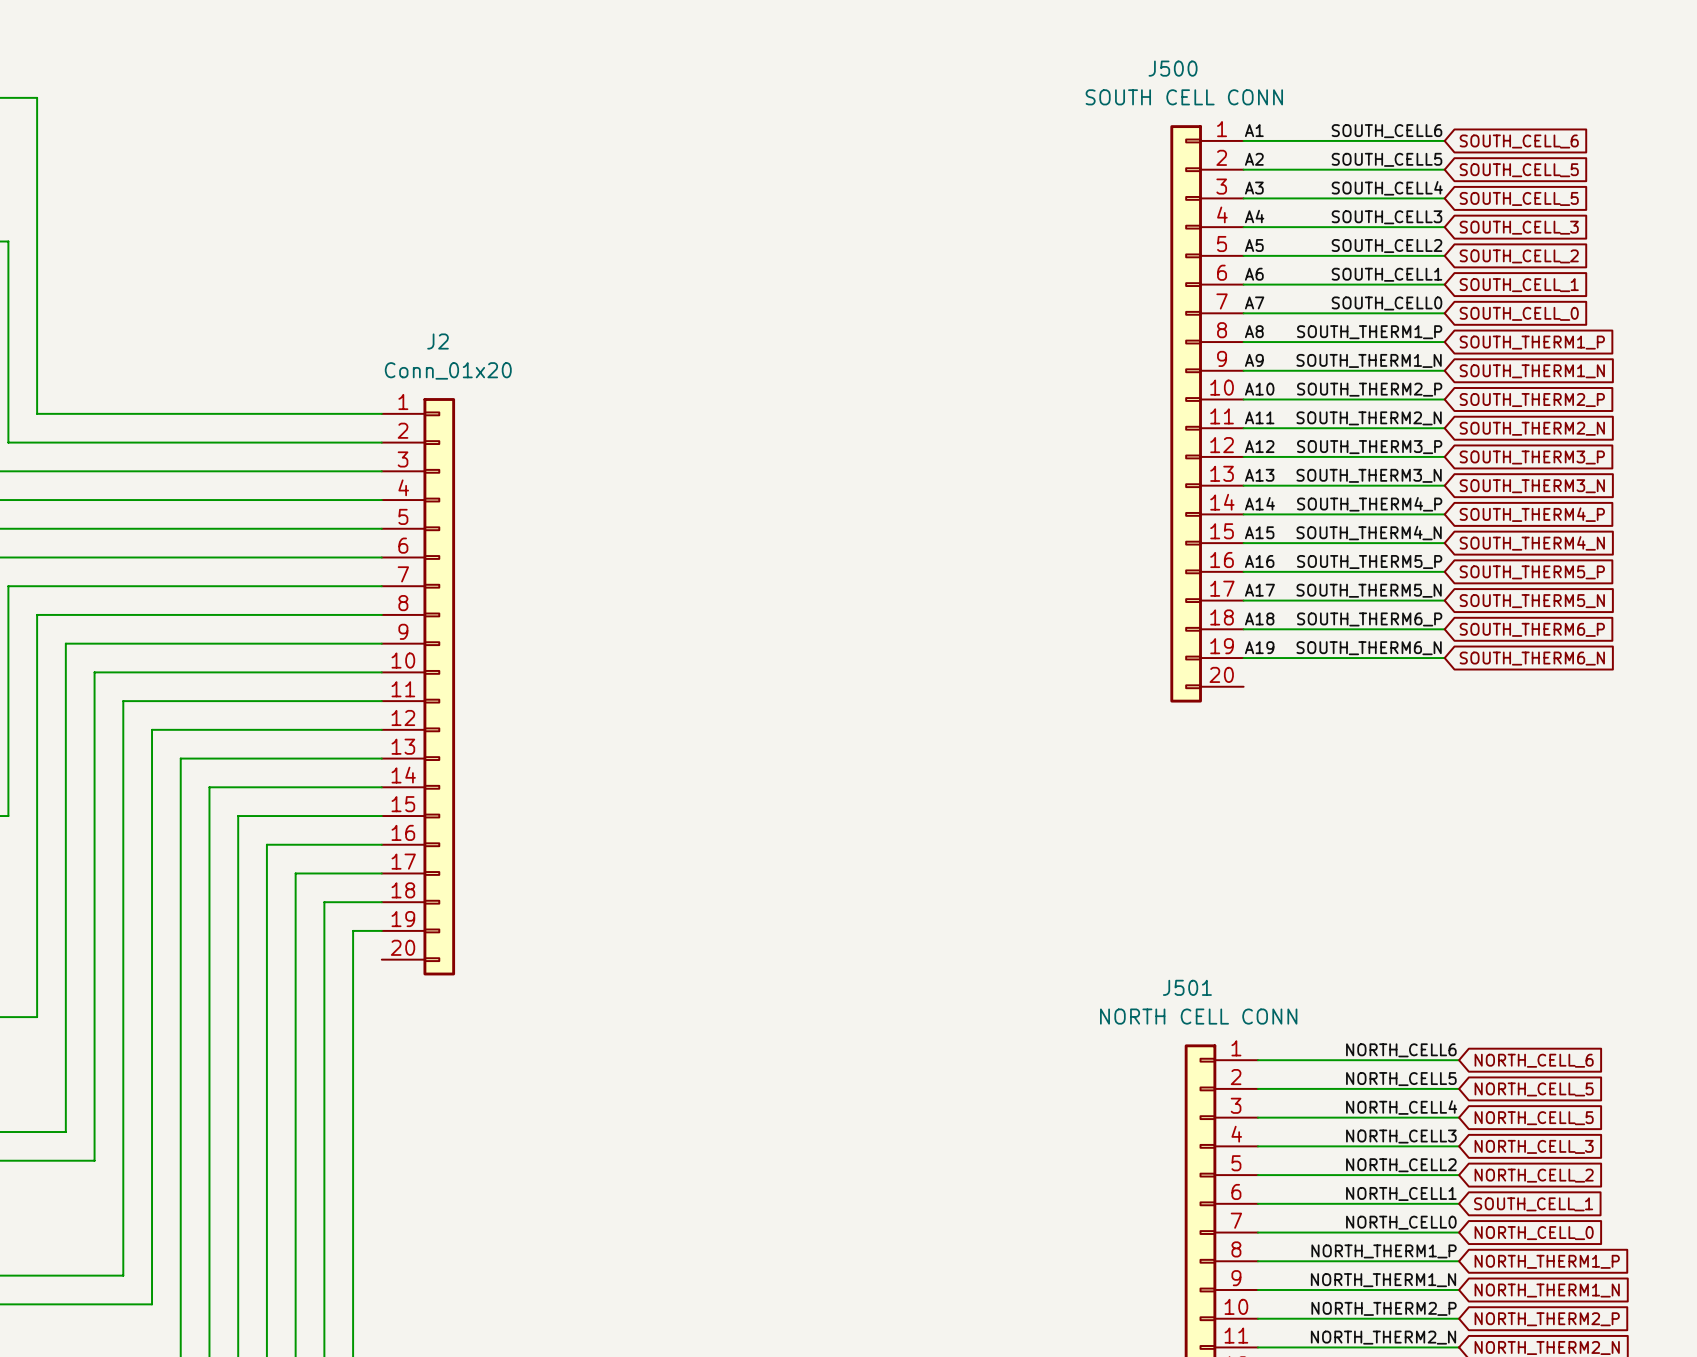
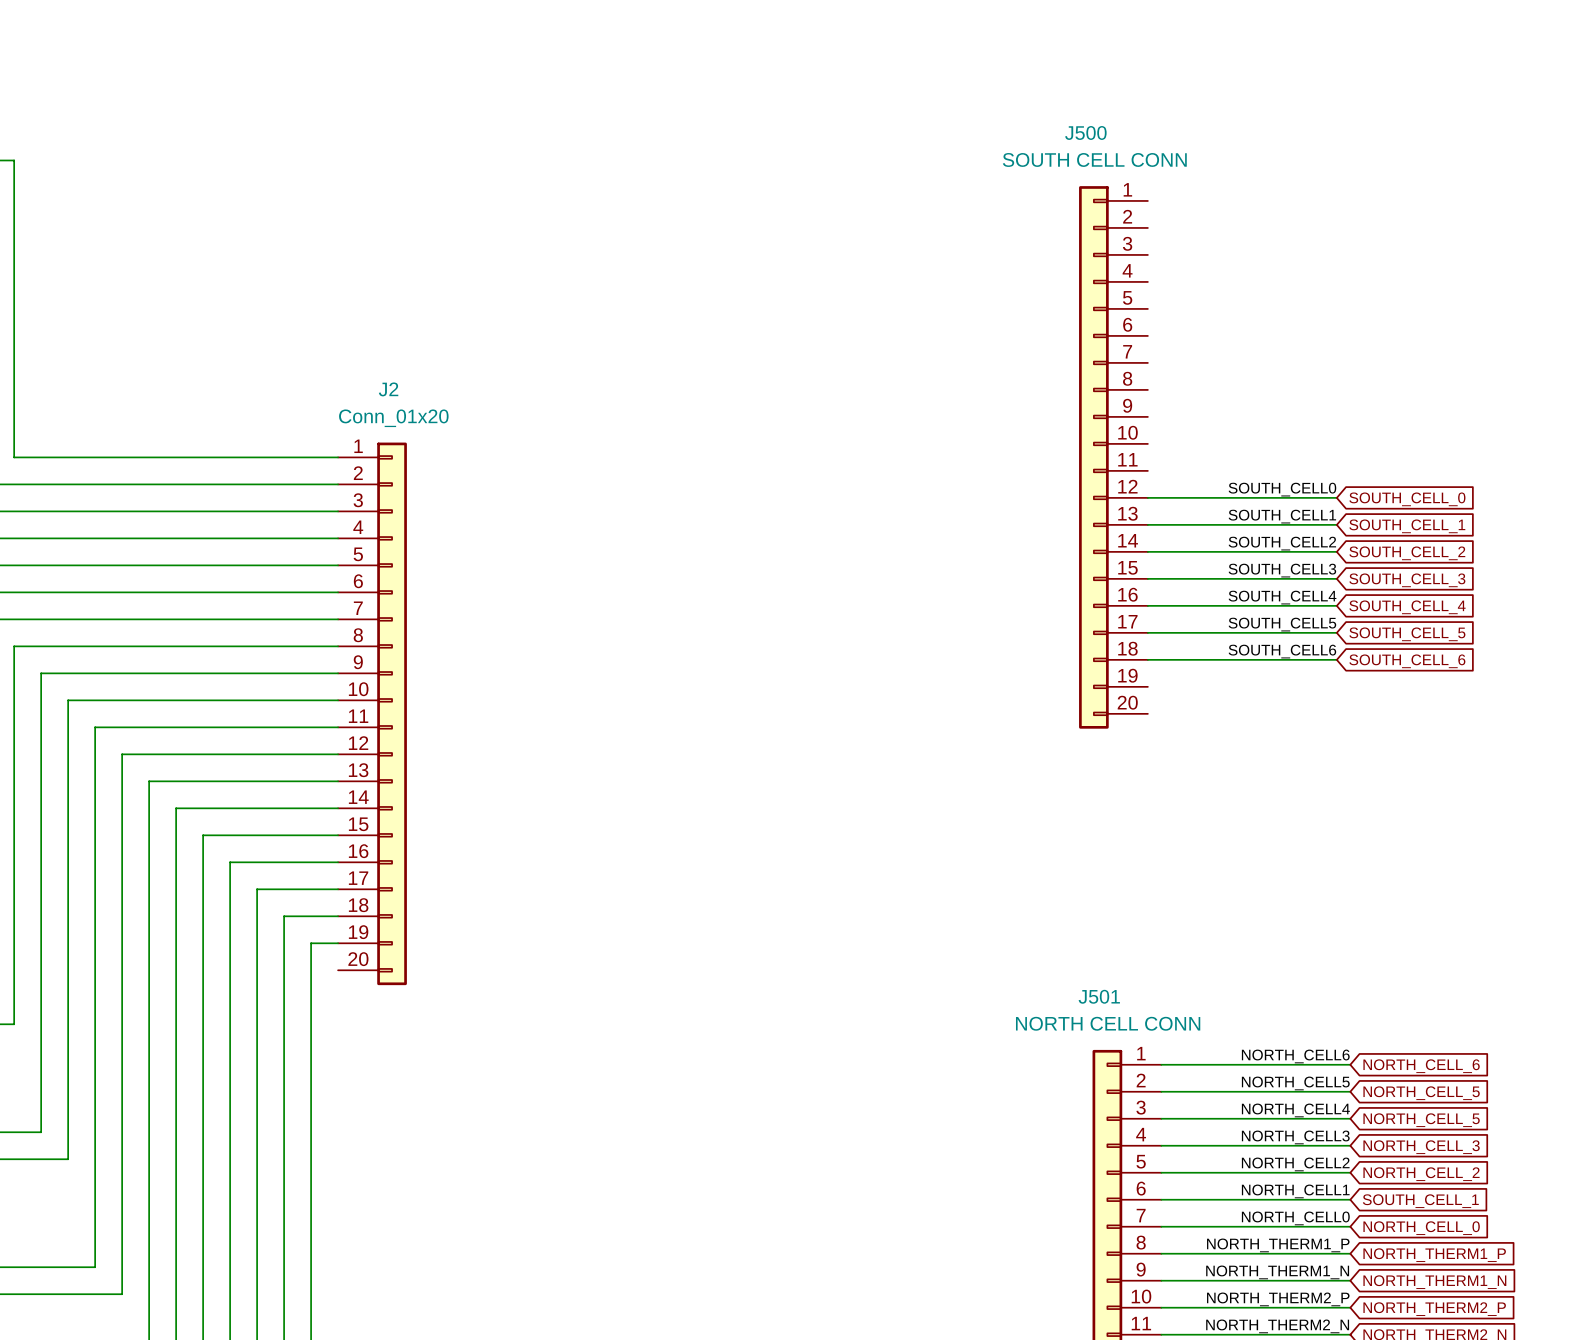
label: A1 (1254, 130) -> none
label: SOUTH_CELL6 (1386, 131) -> none
wire: (1243, 140) (1444, 140) -> none
global label: SOUTH_CELL_6 (1519, 141) -> none
label: A2 (1254, 159) -> none
label: SOUTH_CELL5 (1386, 159) -> none
wire: (1243, 169) (1444, 169) -> none
global label: SOUTH_CELL_5 (1519, 170) -> none
label: A3 (1254, 188) -> none
label: SOUTH_CELL4 (1387, 188) -> none
wire: (1243, 198) (1444, 198) -> none
global label: SOUTH_CELL_5 (1519, 198) -> none
label: A4 (1254, 216) -> none
label: SOUTH_CELL3 (1386, 217) -> none
wire: (1243, 227) (1444, 227) -> none
global label: SOUTH_CELL_3 (1519, 227) -> none
label: A5 (1254, 245) -> none
label: SOUTH_CELL2 (1386, 246) -> none
wire: (1243, 255) (1444, 255) -> none
global label: SOUTH_CELL_2 (1519, 256) -> none
label: A6 (1254, 274) -> none
label: SOUTH_CELL1 (1386, 274) -> none
wire: (1243, 284) (1444, 284) -> none
global label: SOUTH_CELL_1 (1519, 285) -> none
label: A7 (1254, 302) -> none
label: SOUTH_CELL0 (1386, 303) -> none
wire: (1243, 313) (1444, 313) -> none
global label: SOUTH_CELL_0 (1519, 313) -> none
label: A8 (1254, 331) -> none
label: SOUTH_THERM1_P (1369, 332) -> none
wire: (1243, 342) (1444, 342) -> none
global label: SOUTH_THERM1_P (1532, 342) -> none
label: A9 (1254, 360) -> none
label: SOUTH_THERM1_N (1369, 360) -> none
wire: (1243, 370) (1444, 370) -> none
global label: SOUTH_THERM1_N (1532, 371) -> none
label: A10 (1259, 389) -> none
label: SOUTH_THERM2_P (1369, 389) -> none
wire: (1243, 399) (1444, 399) -> none
global label: SOUTH_THERM2_P (1532, 400) -> none
label: A11 (1259, 417) -> none
label: SOUTH_THERM2_N (1369, 418) -> none
wire: (1243, 428) (1444, 428) -> none
global label: SOUTH_THERM2_N (1532, 428) -> none
label: A12 (1259, 446) -> none
label: SOUTH_THERM3_P (1369, 447) -> SOUTH_CELL0 (1282, 489)
global label: SOUTH_THERM3_P (1532, 457) -> SOUTH_CELL_0 (1407, 499)
label: A13 (1259, 475) -> none
label: SOUTH_THERM3_N (1369, 475) -> SOUTH_CELL1 (1282, 516)
global label: SOUTH_THERM3_N (1532, 486) -> SOUTH_CELL_1 (1407, 526)
label: A14 (1259, 503) -> none
label: SOUTH_THERM4_P (1369, 504) -> SOUTH_CELL2 (1282, 543)
global label: SOUTH_THERM4_P (1532, 514) -> SOUTH_CELL_2 (1407, 553)
label: A15 (1259, 532) -> none
label: SOUTH_THERM4_N (1369, 533) -> SOUTH_CELL3 (1282, 570)
global label: SOUTH_THERM4_N (1532, 543) -> SOUTH_CELL_3 (1407, 580)
label: A16 (1259, 561) -> none
label: SOUTH_THERM5_P (1369, 562) -> SOUTH_CELL4 (1282, 597)
global label: SOUTH_THERM5_P (1532, 572) -> SOUTH_CELL_4 (1407, 607)
label: A17 (1259, 590) -> none
label: SOUTH_THERM5_N (1369, 590) -> SOUTH_CELL5 (1282, 624)
global label: SOUTH_THERM5_N (1532, 601) -> SOUTH_CELL_5 (1407, 634)
label: A18 (1259, 618) -> none
label: SOUTH_THERM6_P (1369, 619) -> SOUTH_CELL6 (1282, 651)
global label: SOUTH_THERM6_P (1532, 629) -> SOUTH_CELL_6 (1407, 661)
label: A19 (1259, 647) -> none
label: SOUTH_THERM6_N (1369, 648) -> none
wire: (1243, 658) (1444, 658) -> none
global label: SOUTH_THERM6_N (1532, 658) -> none

